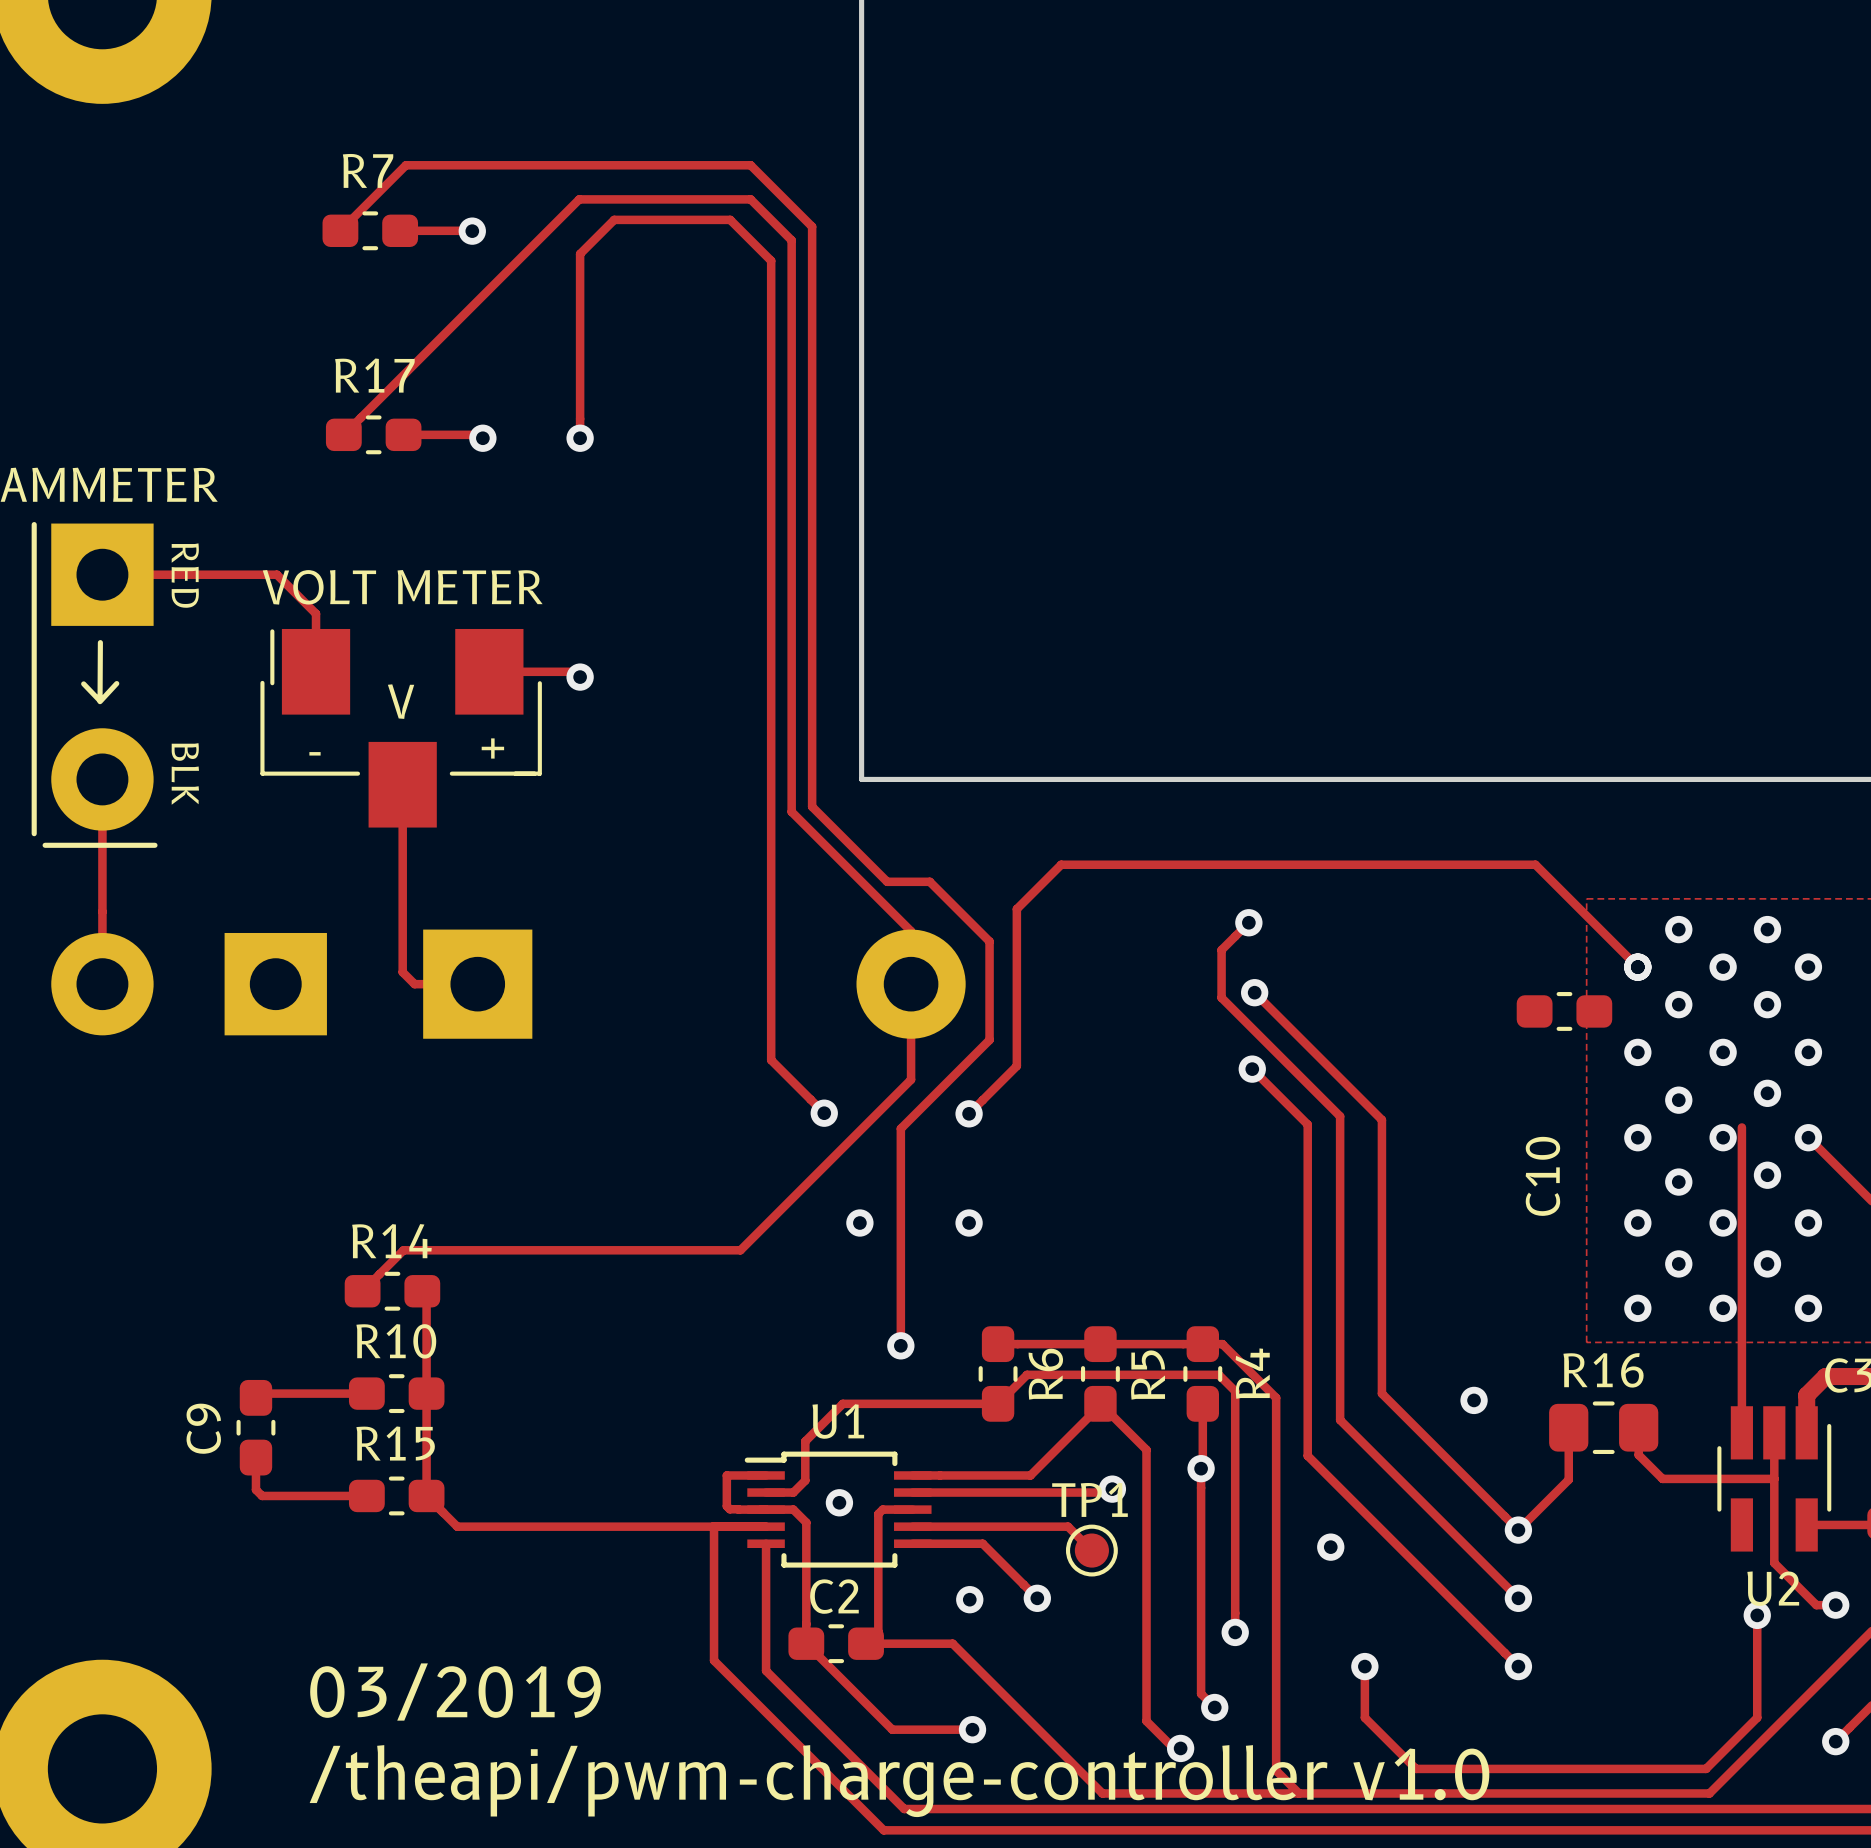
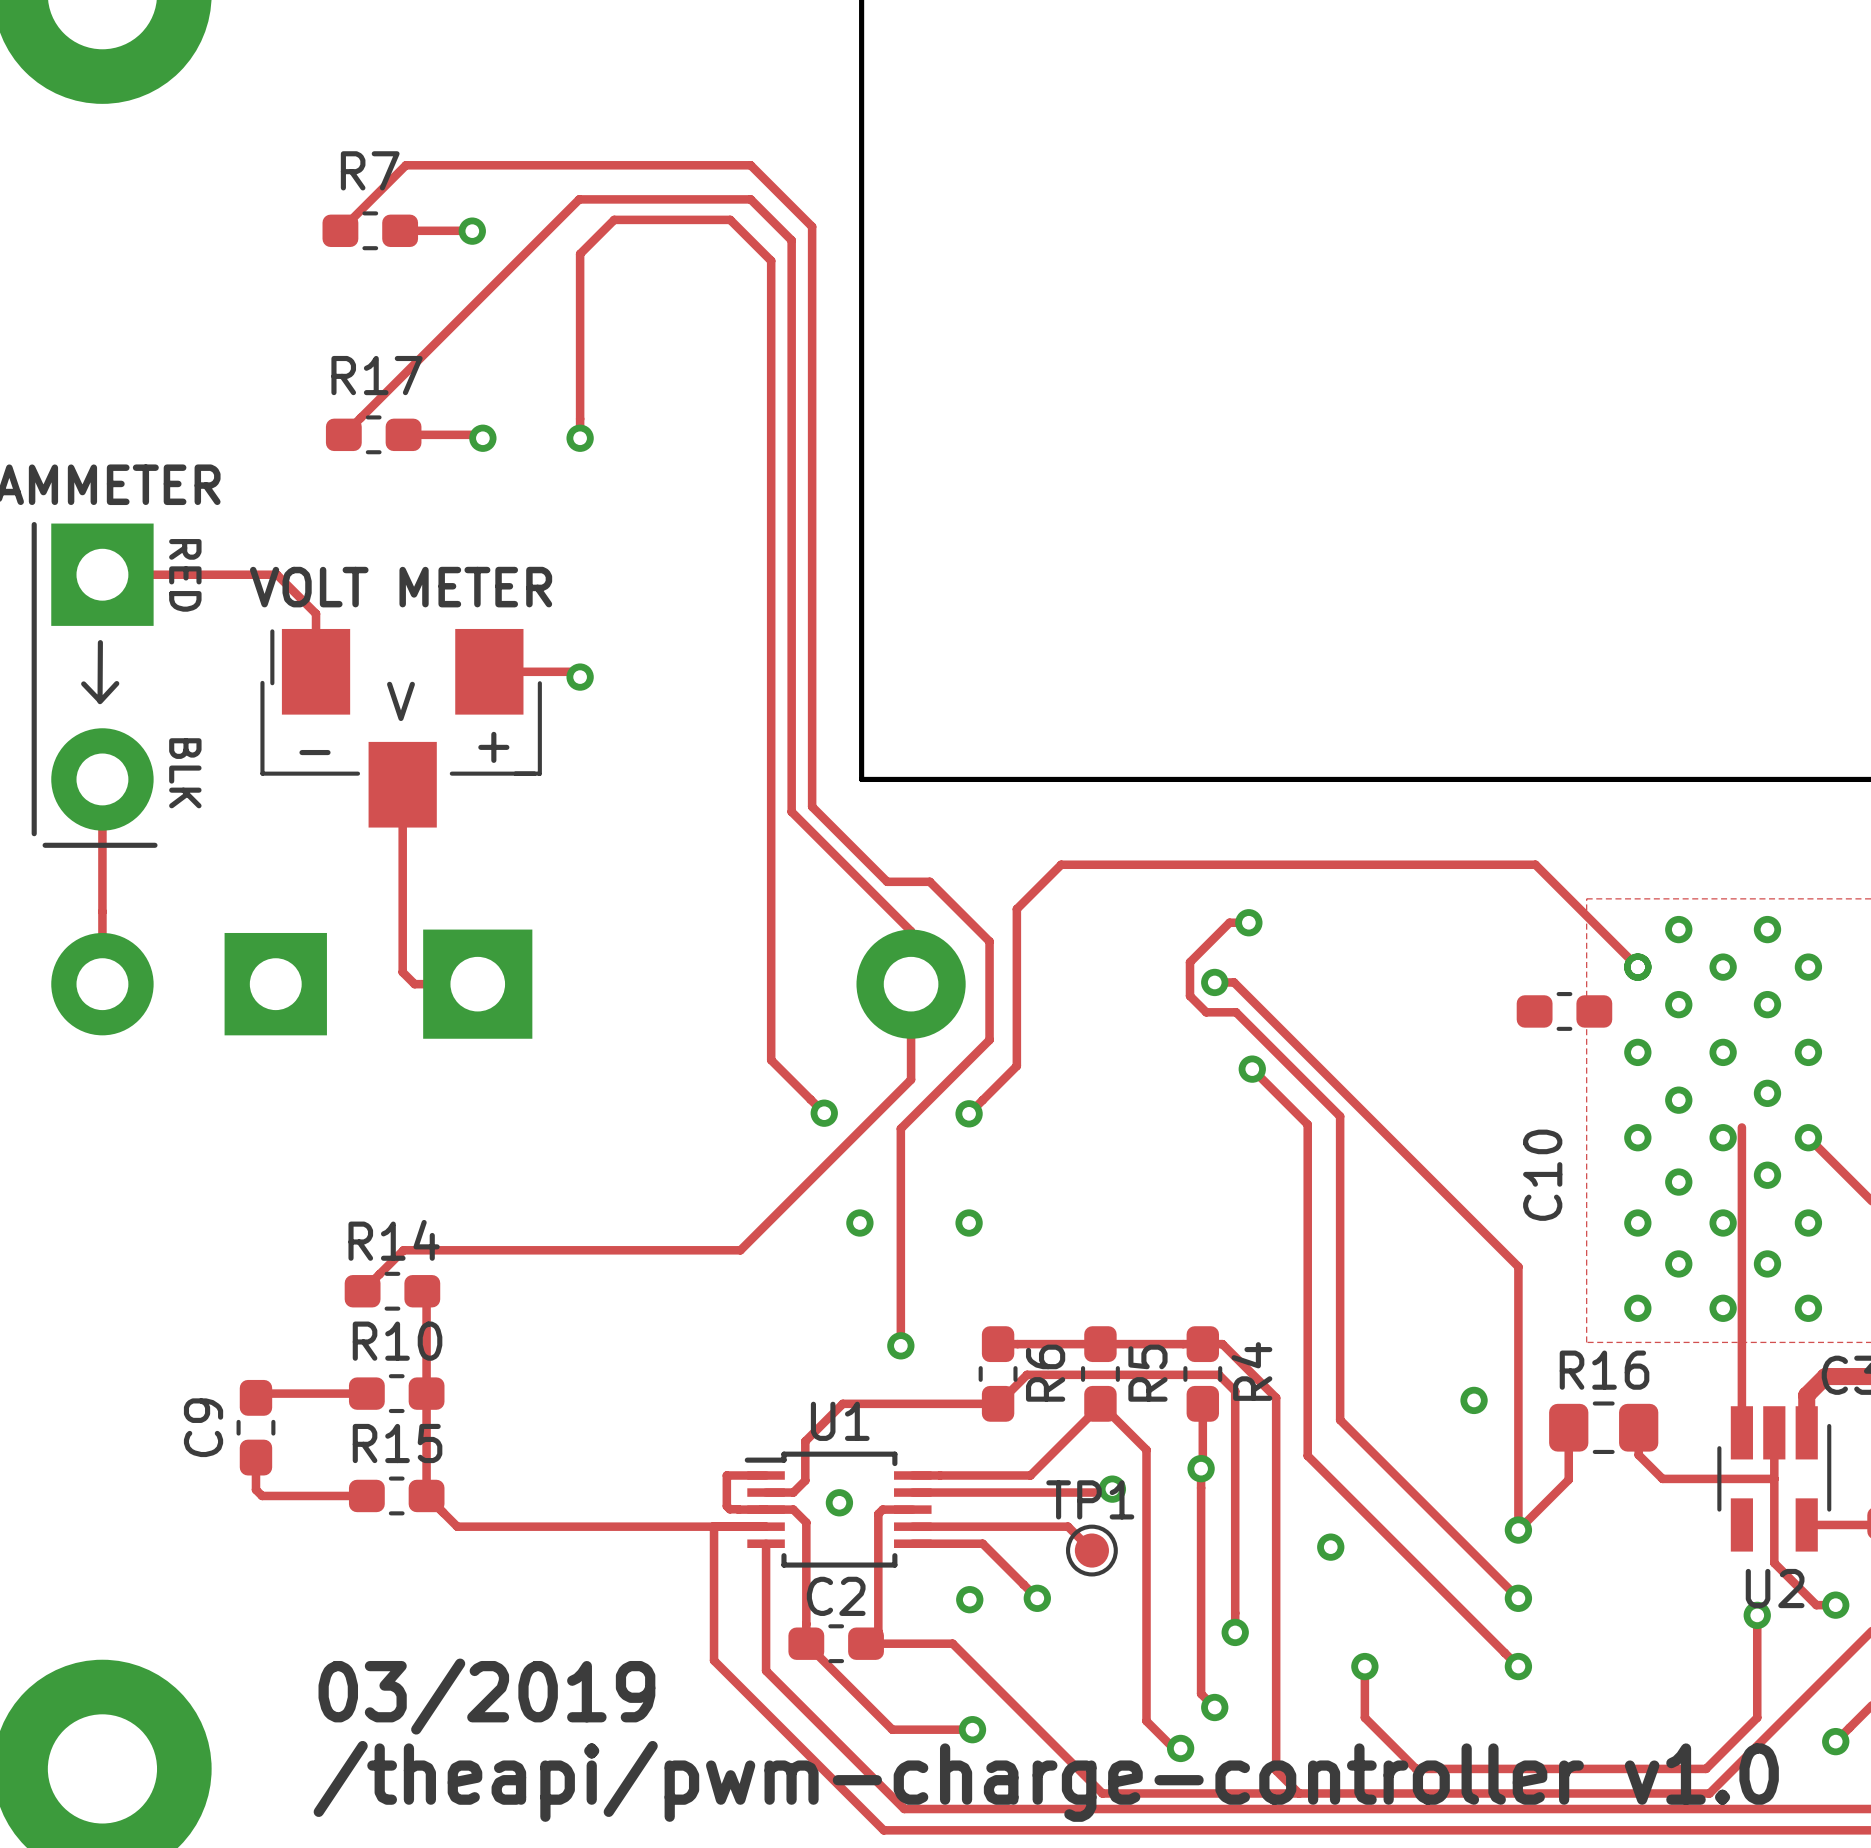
track: (1248, 922) (1221, 950) (1221, 997) (1236, 1012) -> (1248, 922) (1229, 922) (1190, 962) (1190, 996) (1206, 1012) (1236, 1012)
track: (1254, 992) (1381, 1119) (1381, 1393) (1518, 1530) -> (1214, 982) (1234, 982) (1518, 1266) (1518, 1530)
via position: (1254, 992) -> (1214, 982)

